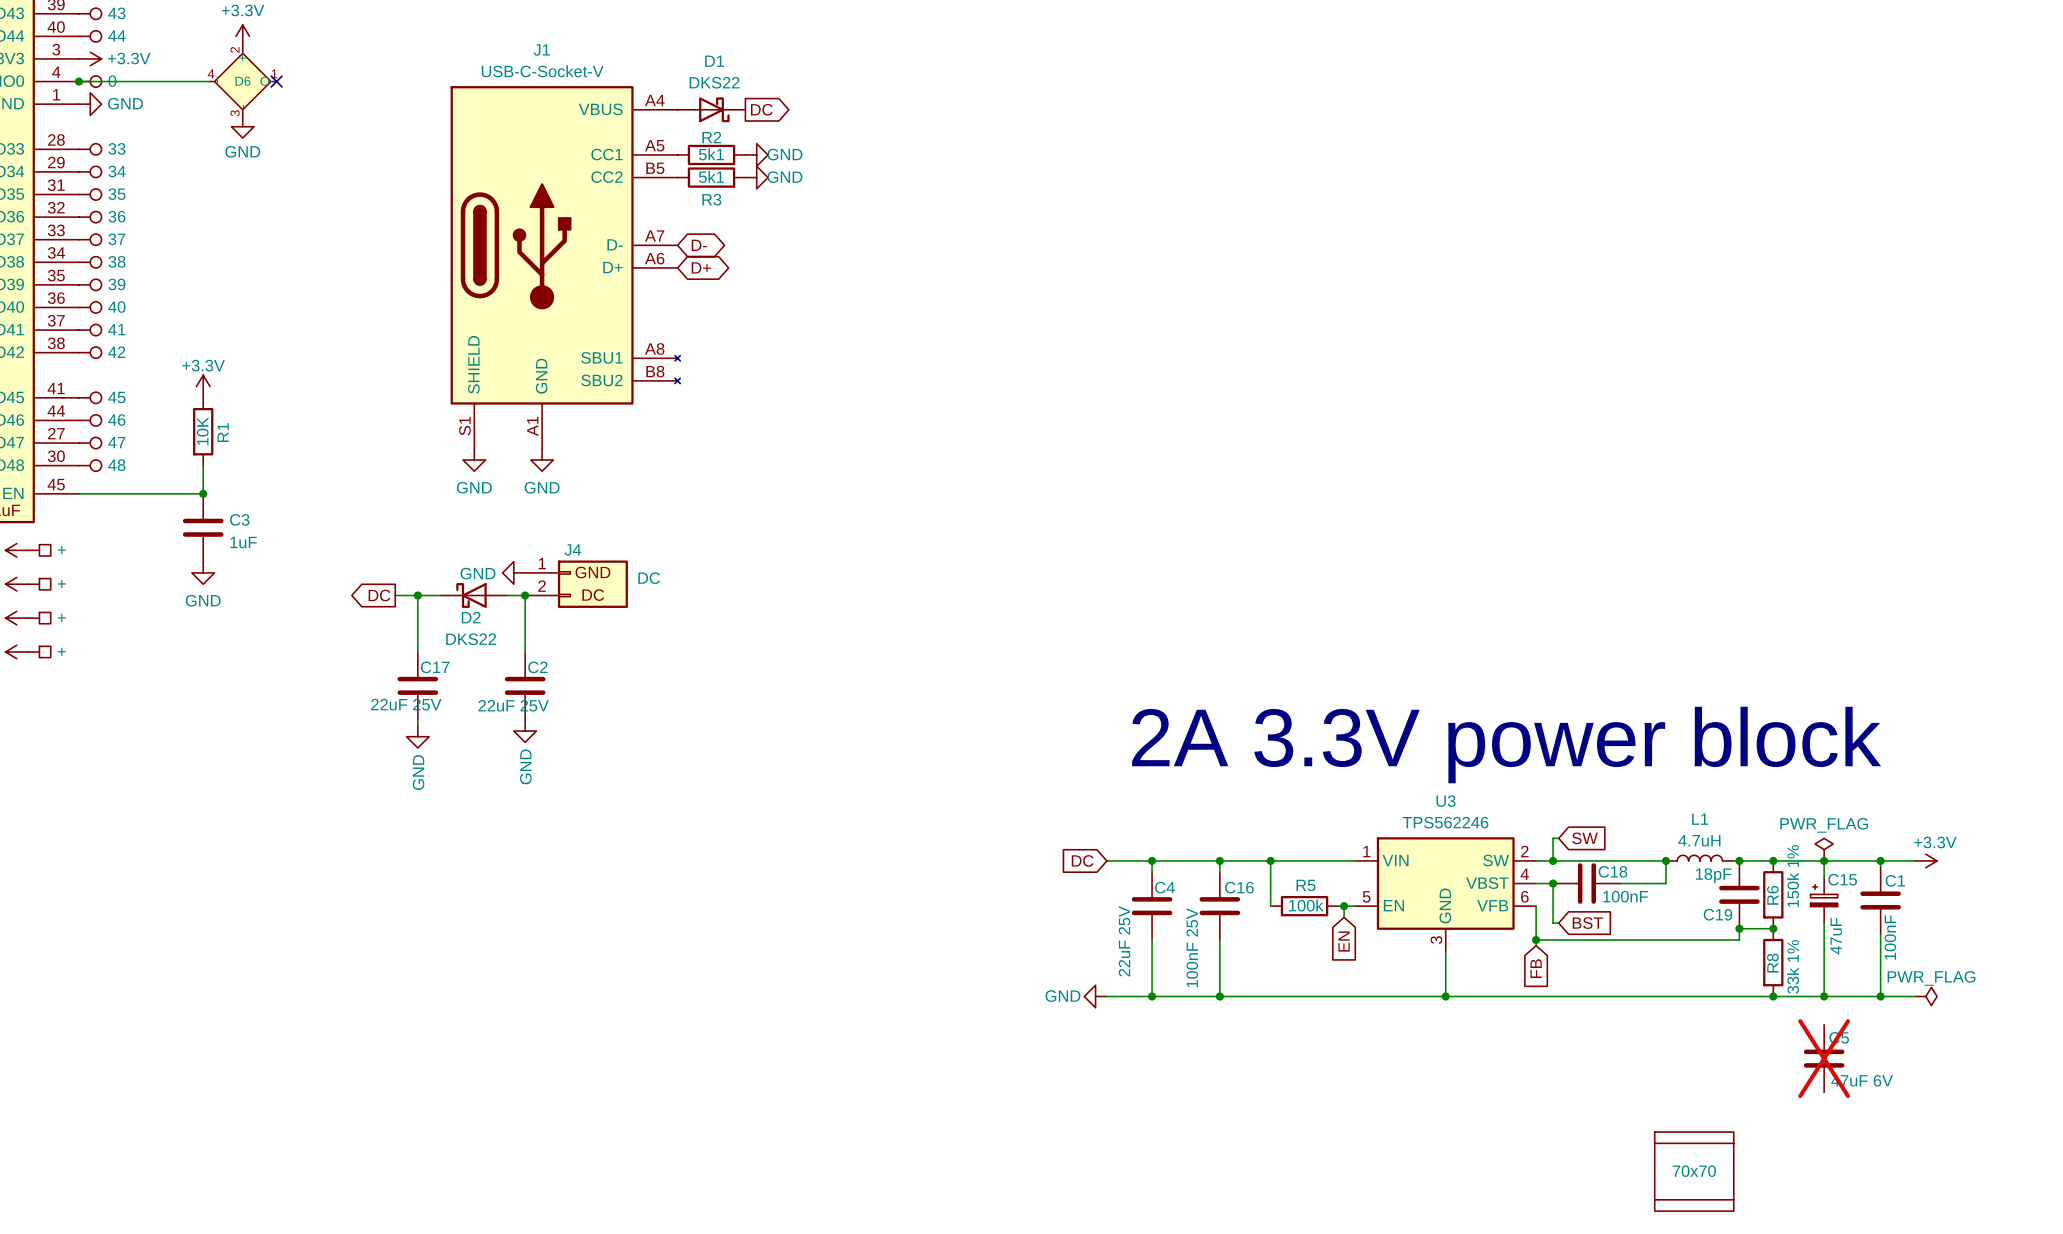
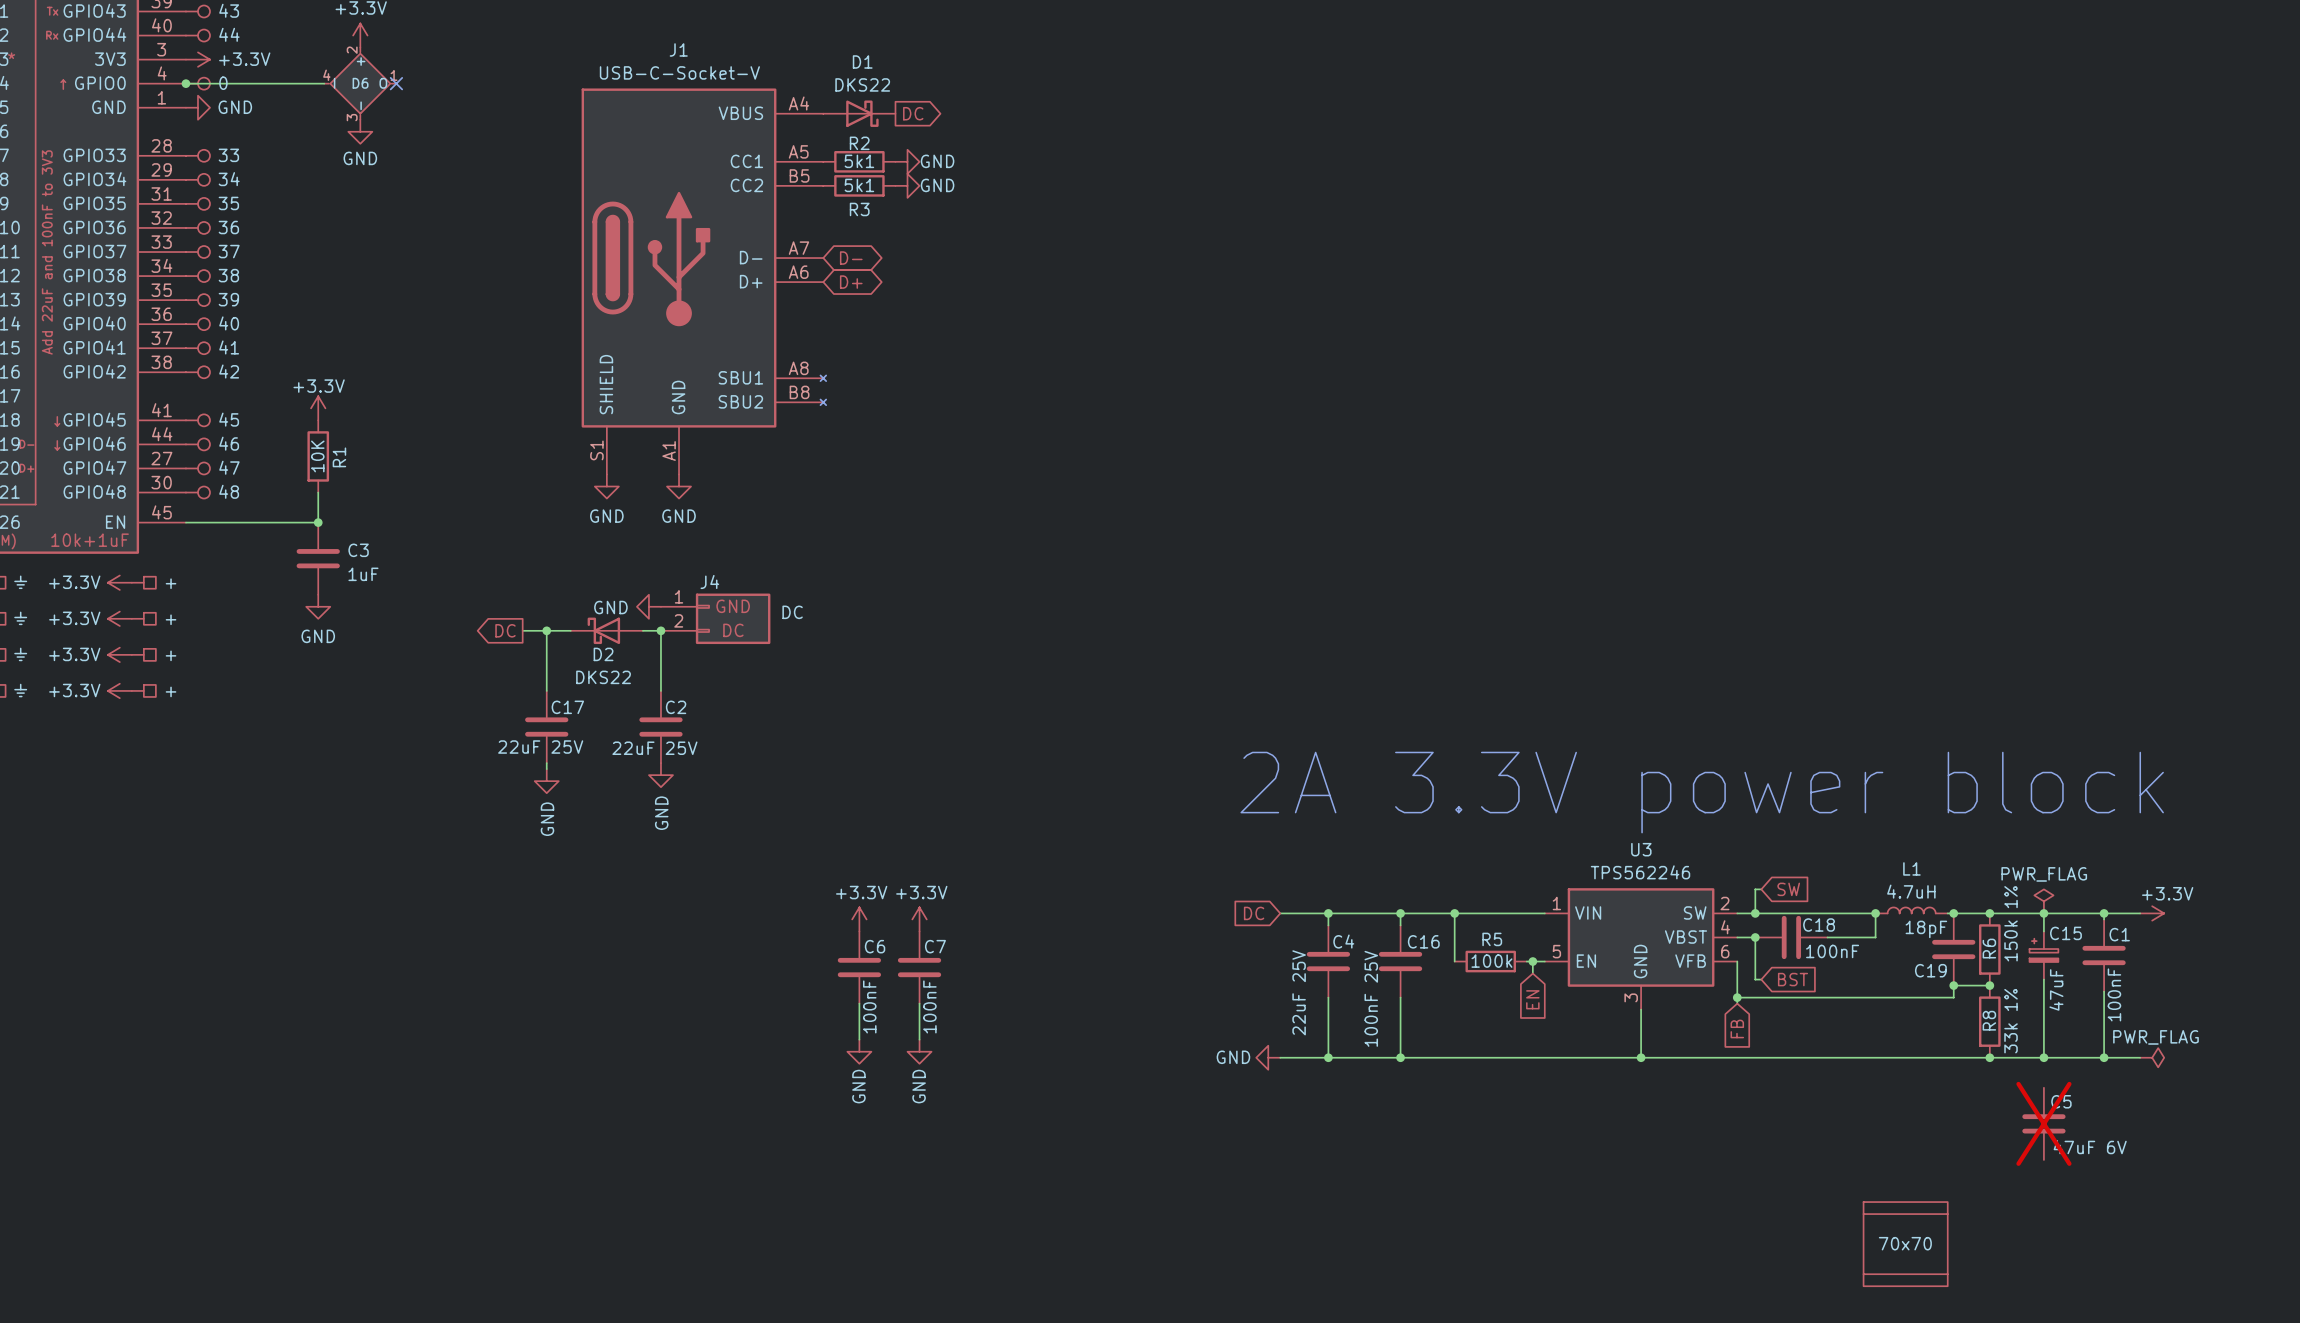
power symbol: none -> +3.3V (859, 919)
power symbol: none -> +3.3V (919, 919)
C6: none -> 100nF (859, 967)
C7: none -> 100nF (919, 967)
wire: none -> (859, 1003) (859, 1039)
wire: none -> (919, 1003) (919, 1039)
power symbol: none -> GND (859, 1051)
power symbol: none -> GND (919, 1051)

